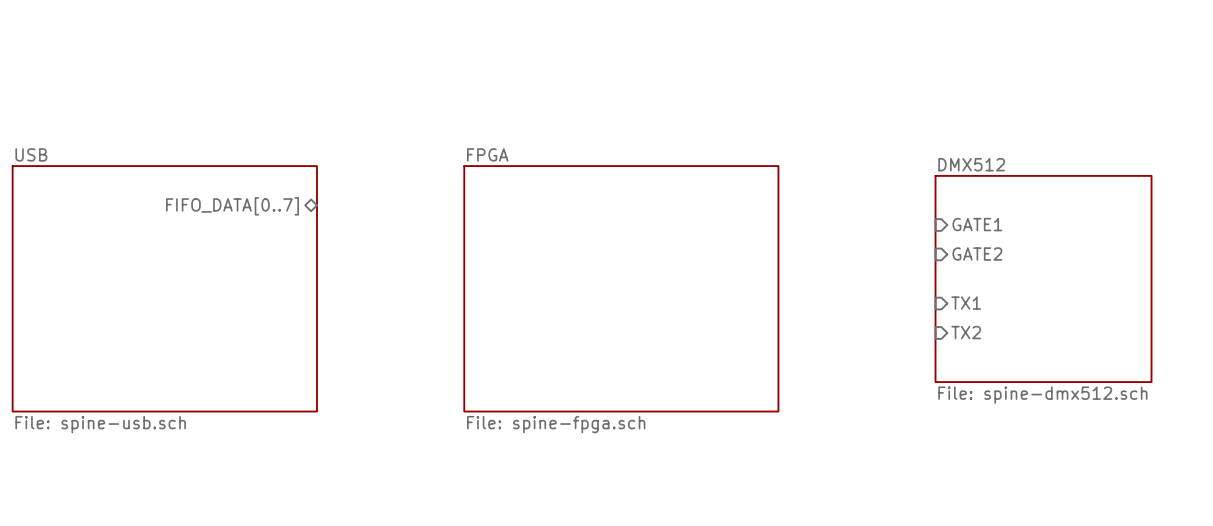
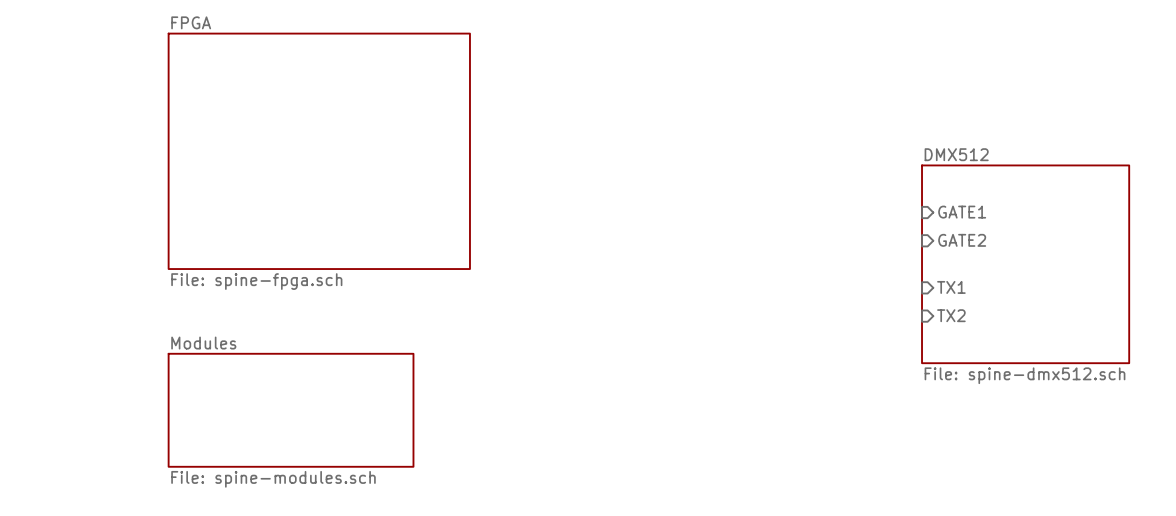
sheet FPGA: none -> File: spine-fpga.sch (319, 151)
sheet pin: FIFO_DATA[0..7] (232, 206) -> none
sheet USB: File: spine-usb.sch (164, 288) -> none
sheet FPGA: File: spine-fpga.sch (621, 288) -> none
sheet Modules: none -> File: spine-modules.sch (291, 410)

